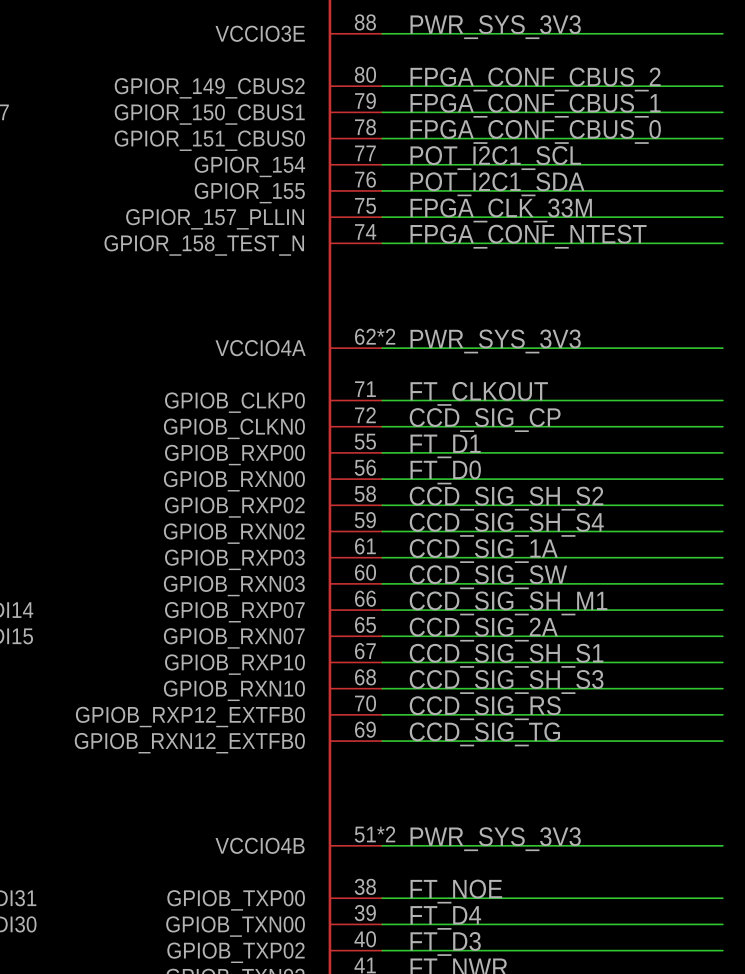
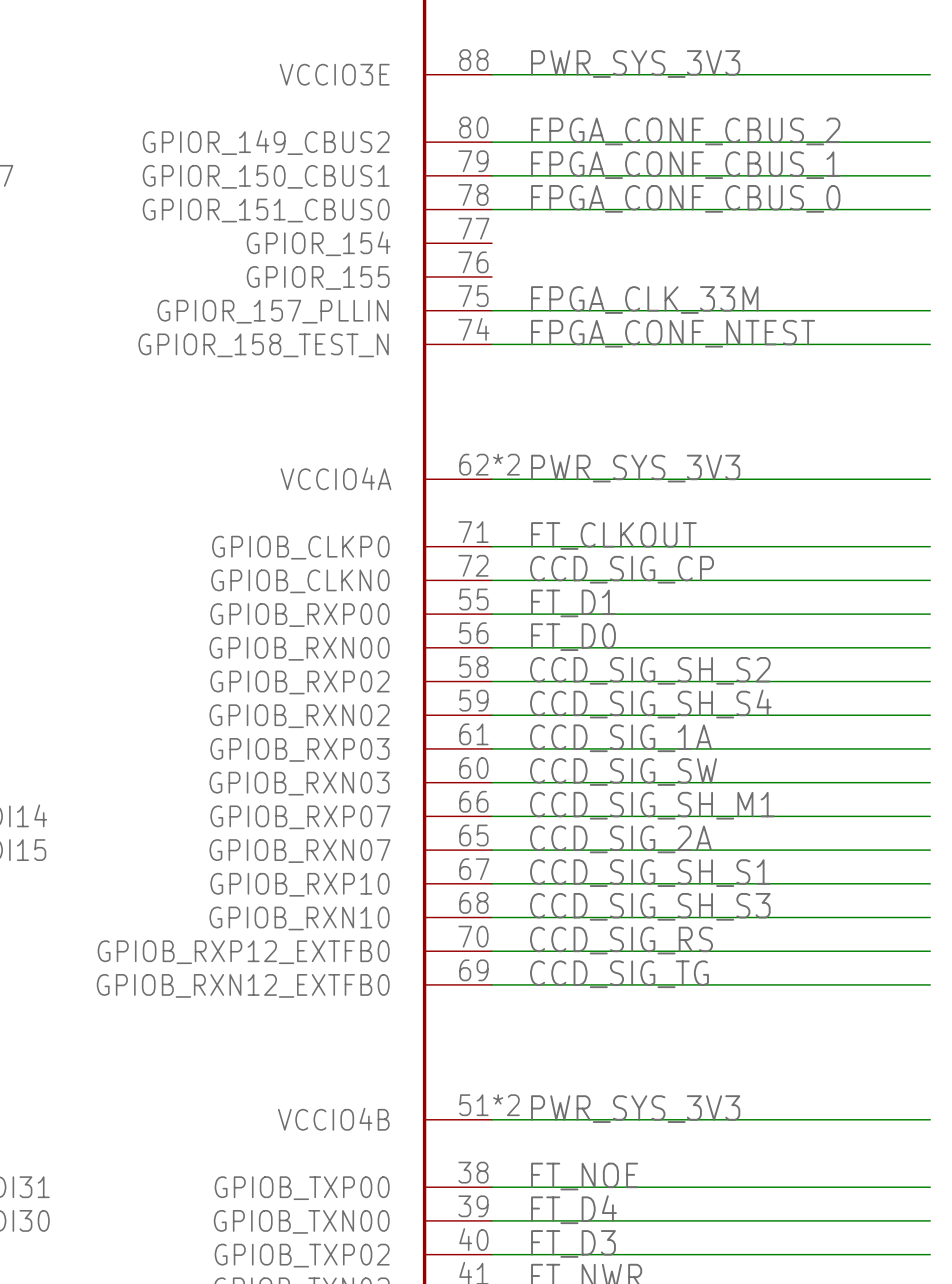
label: POT_I2C1_SCL (495, 158) -> none
wire: (382, 164) (722, 164) -> none
label: POT_I2C1_SDA (497, 184) -> none
wire: (382, 190) (722, 190) -> none

